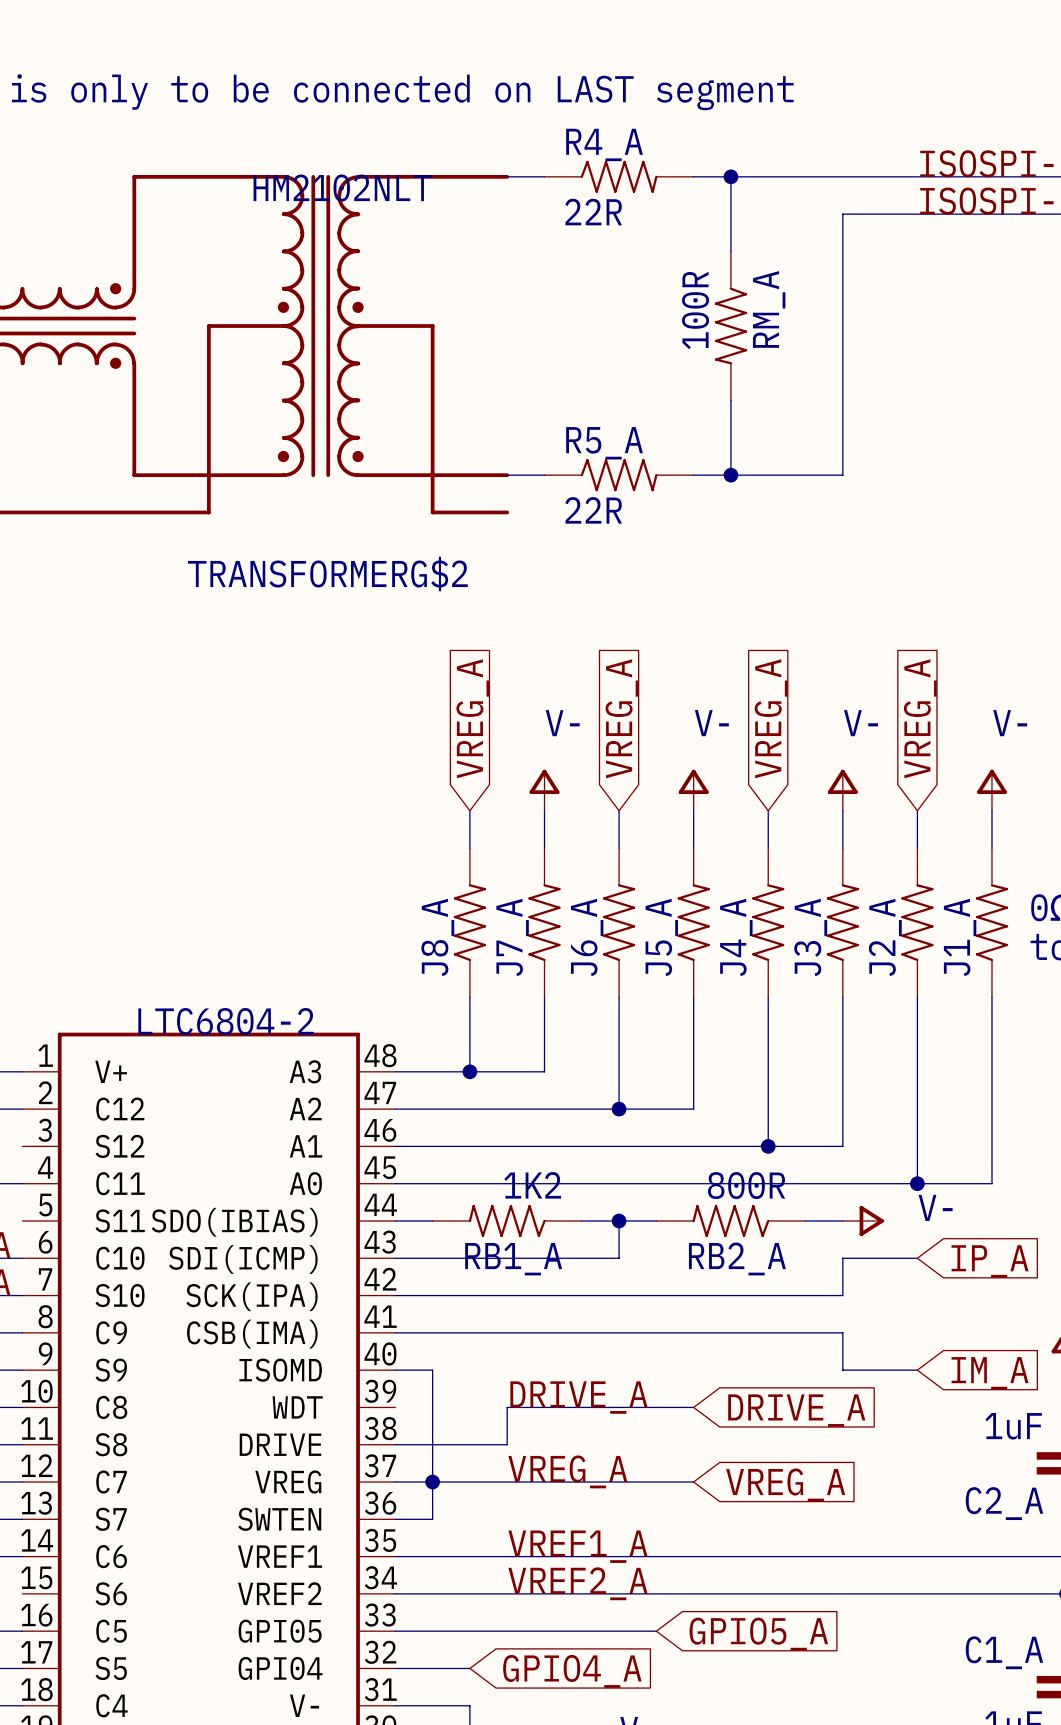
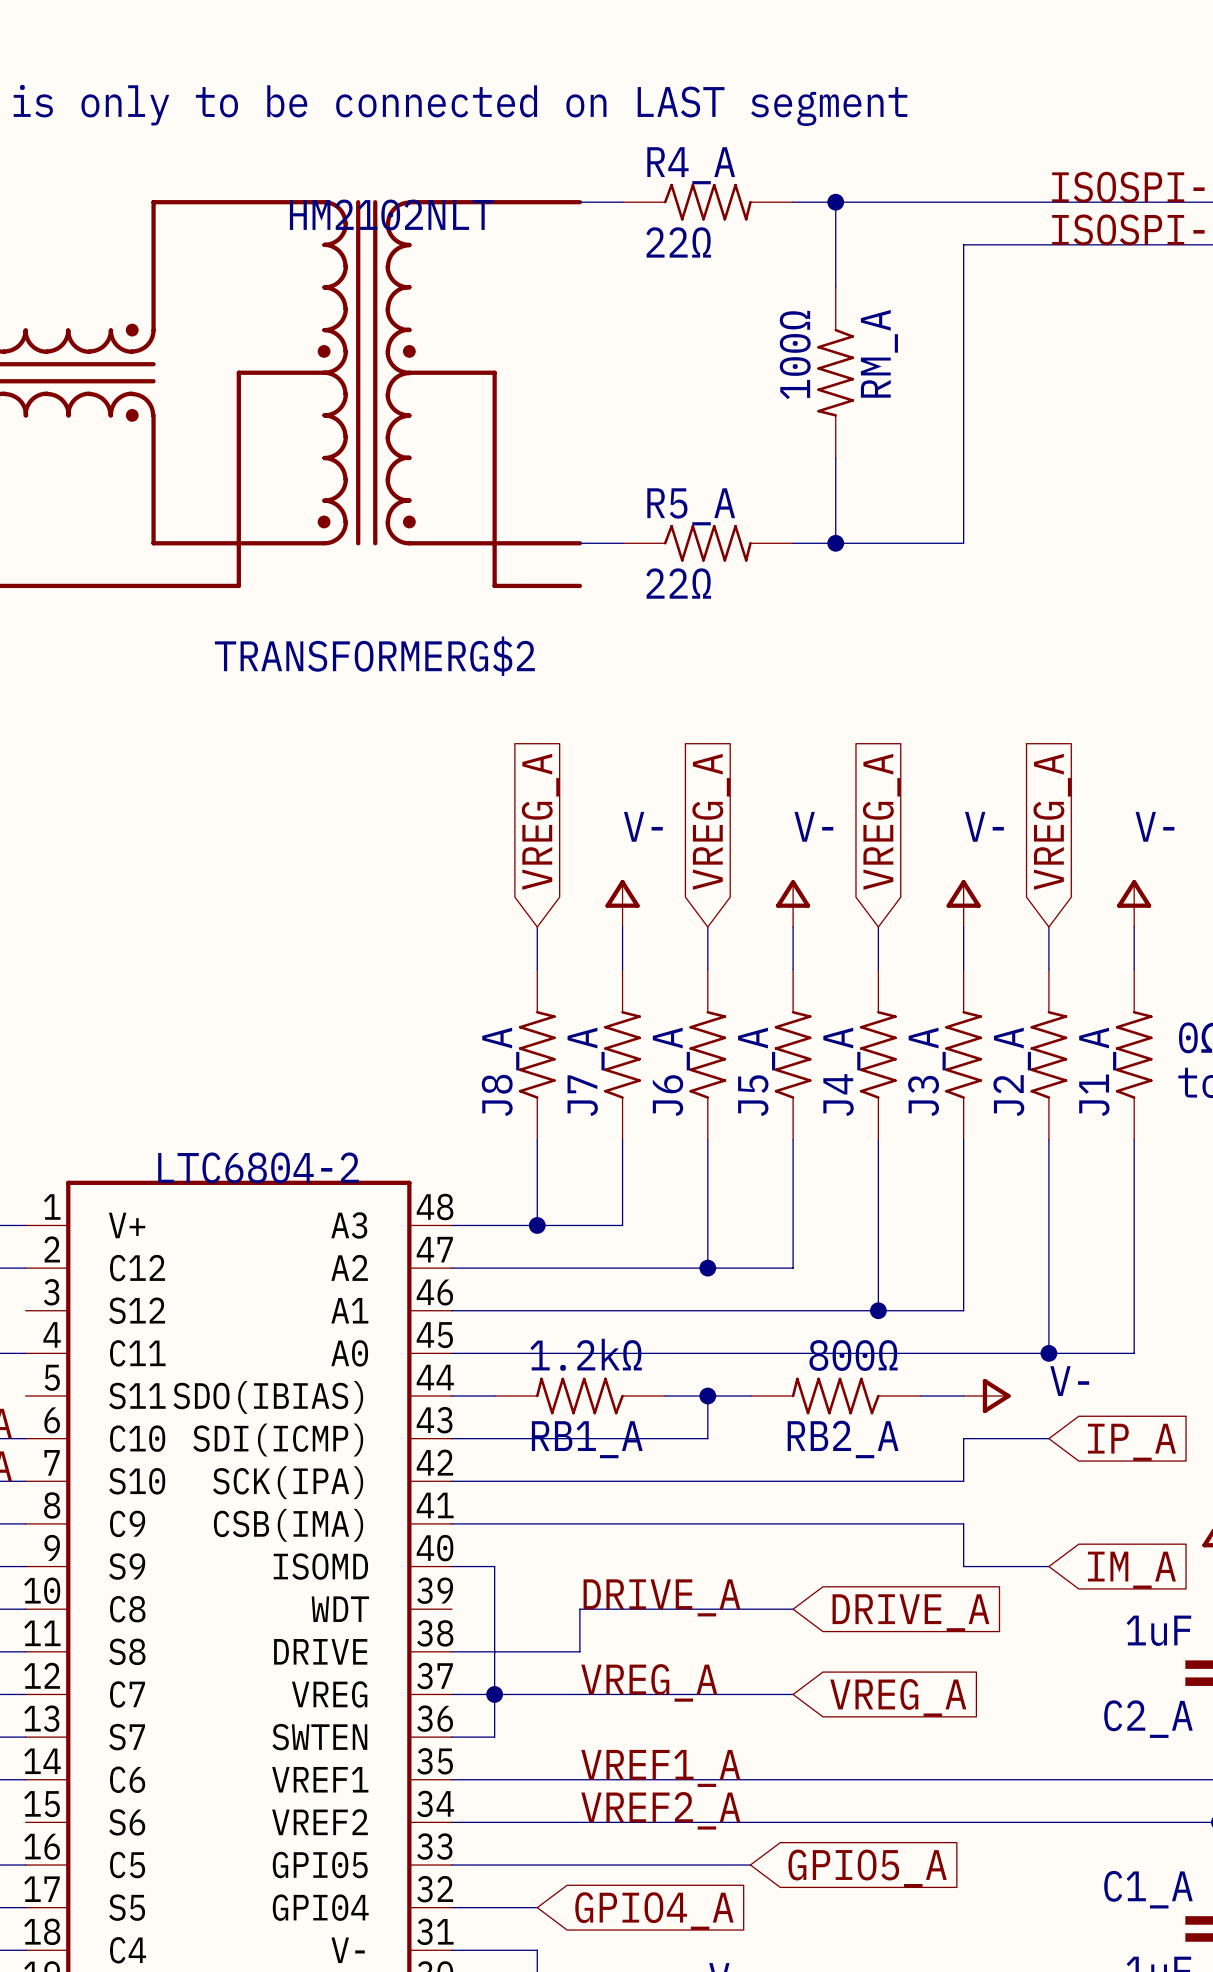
R4_A value: 22R (593, 212) -> 22Ω (678, 242)
RM_A value: 100R (695, 310) -> 100Ω (795, 354)
R5_A value: 22R (593, 510) -> 22Ω (678, 583)
RB1_A value: 1K2 (532, 1185) -> 1.2kΩ (586, 1354)
RB2_A value: 800R (746, 1185) -> 800Ω (853, 1355)

